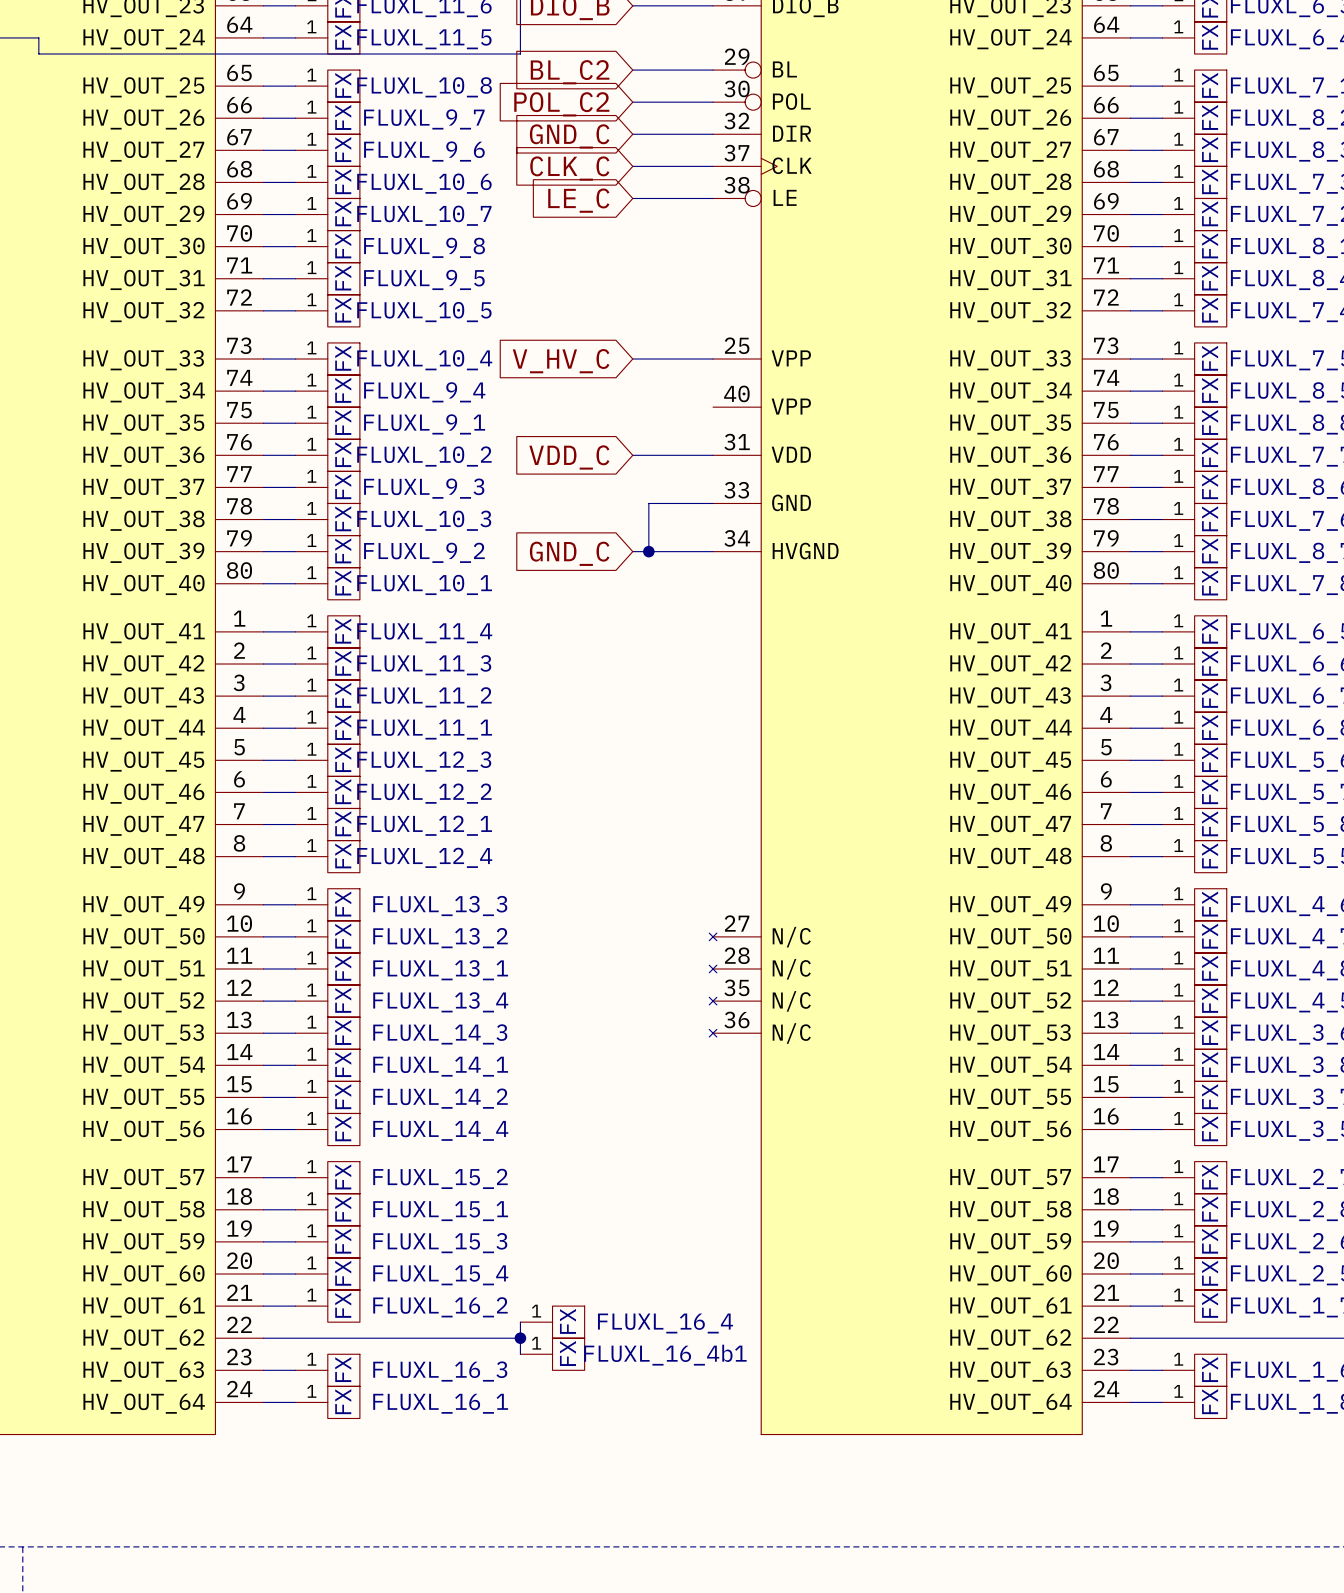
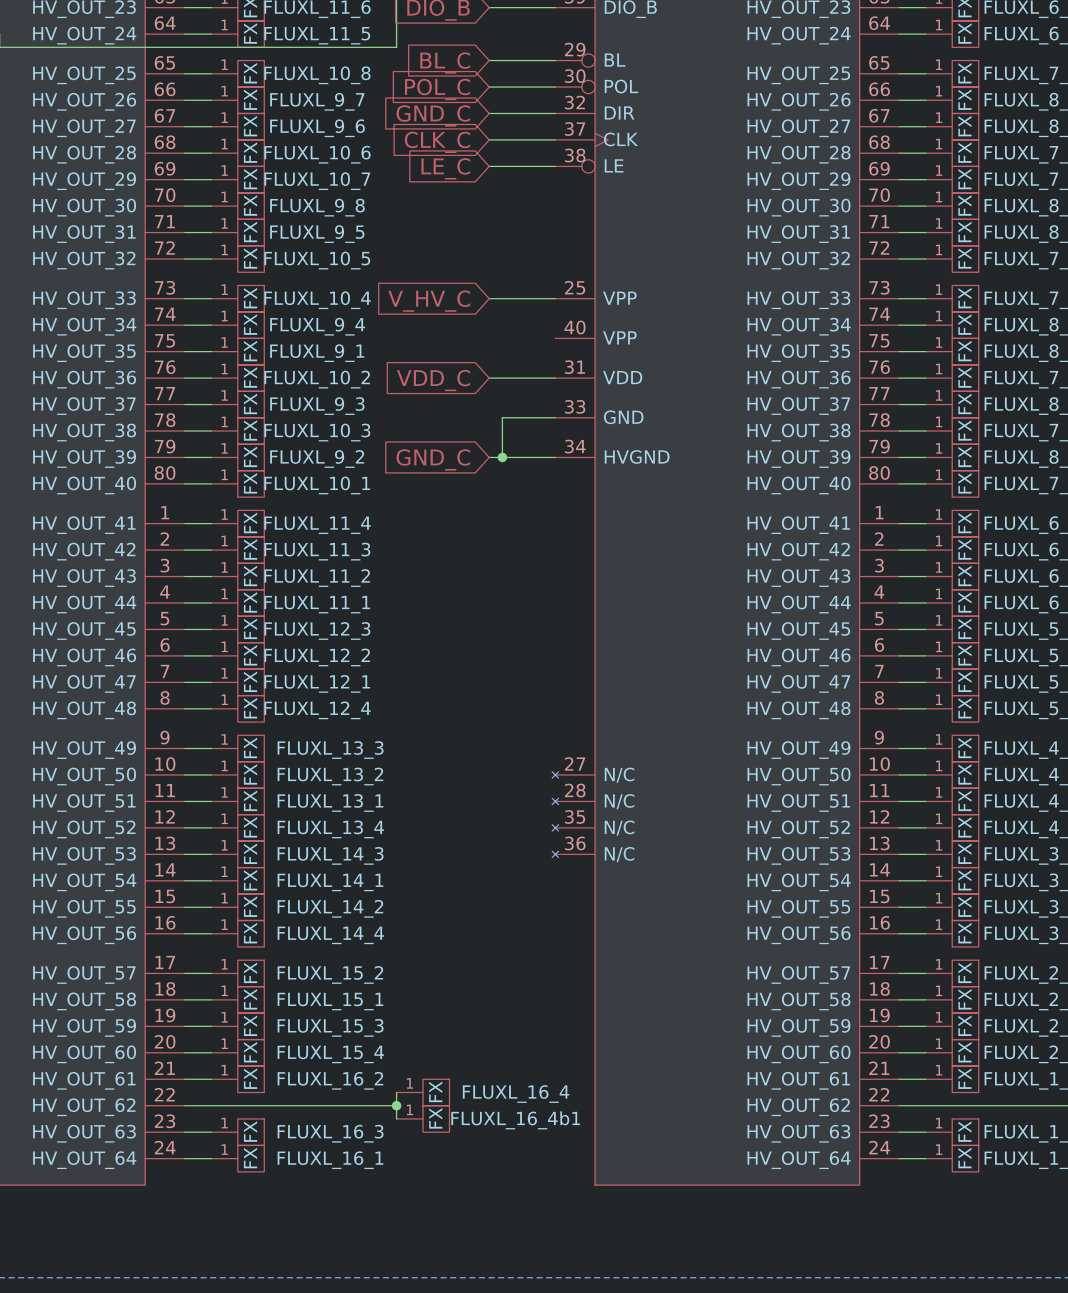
global label: BL_C2 (570, 72) -> BL_C (445, 62)
global label: POL_C2 (561, 104) -> POL_C (437, 89)

